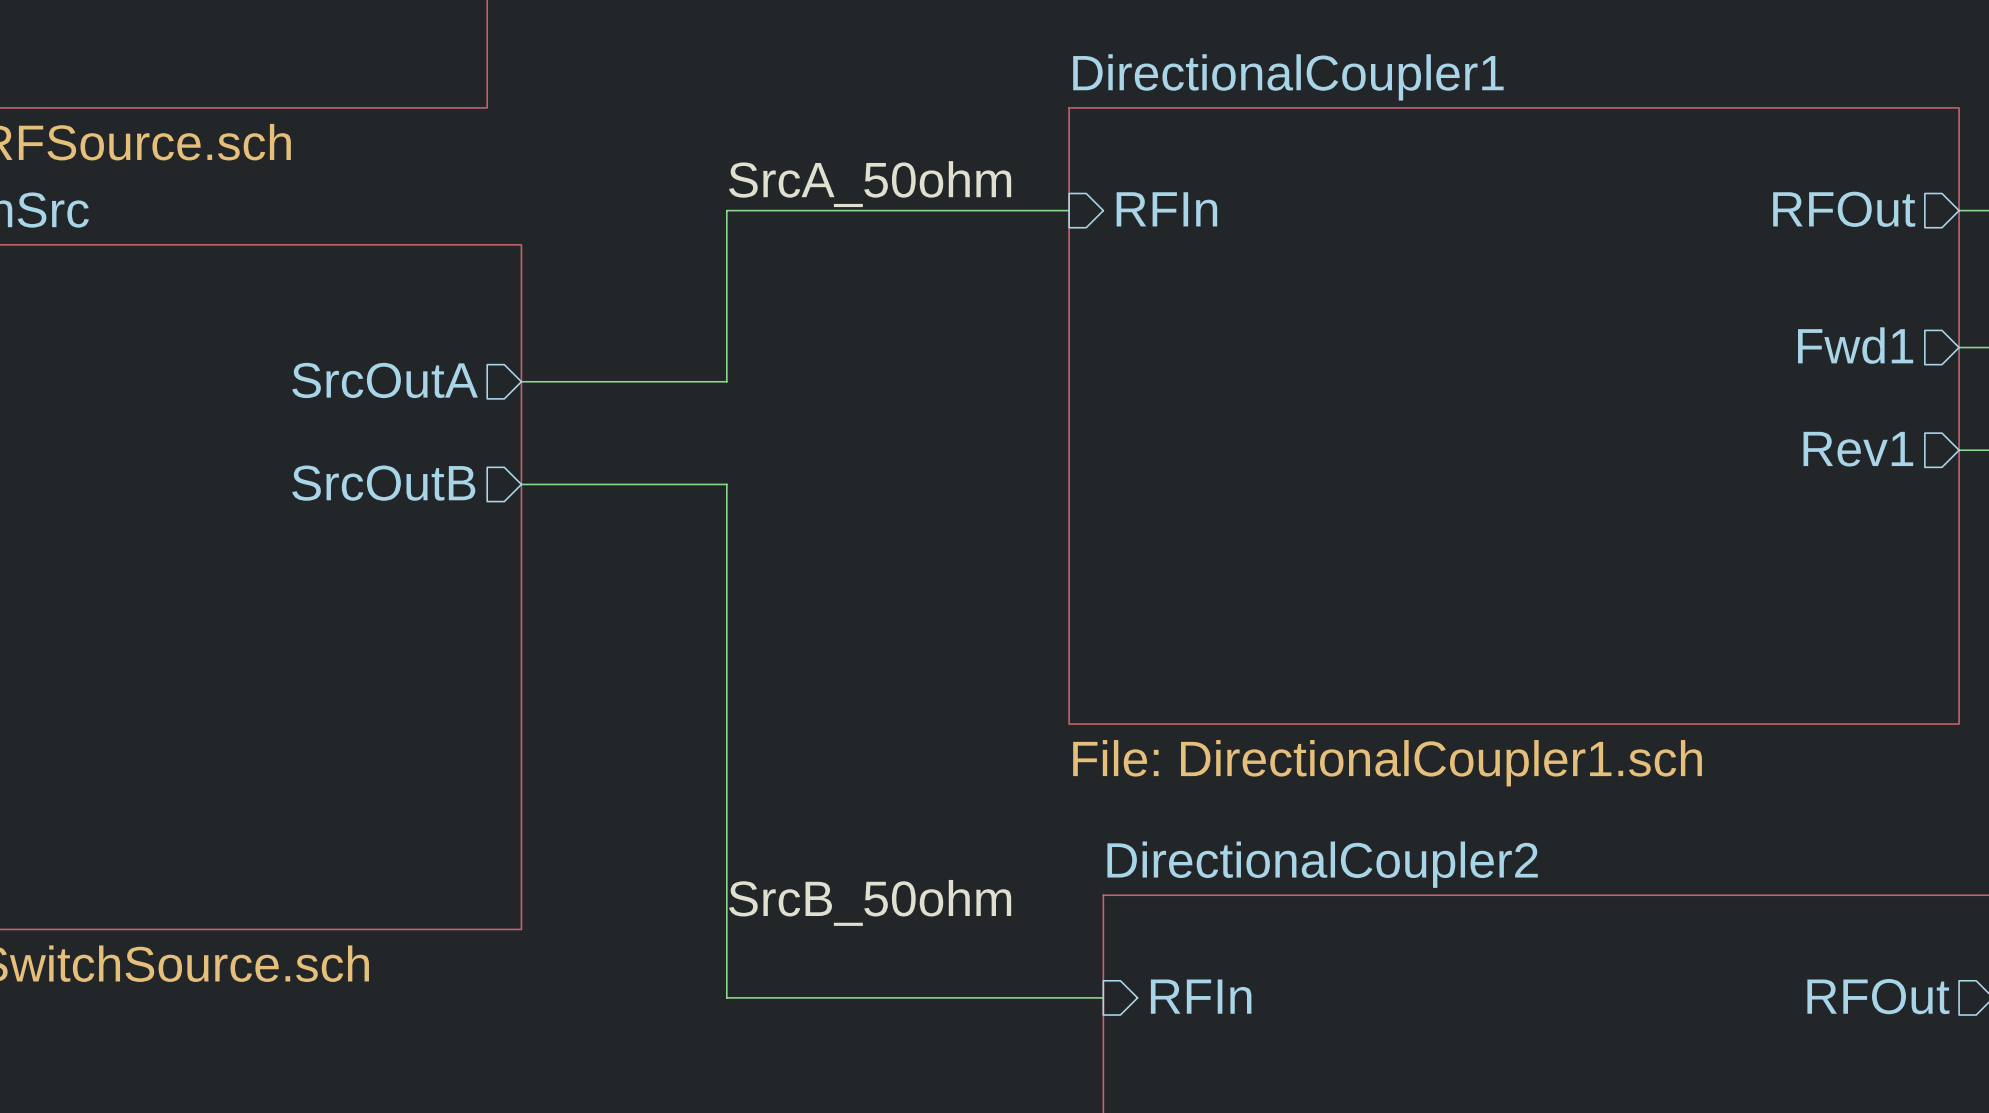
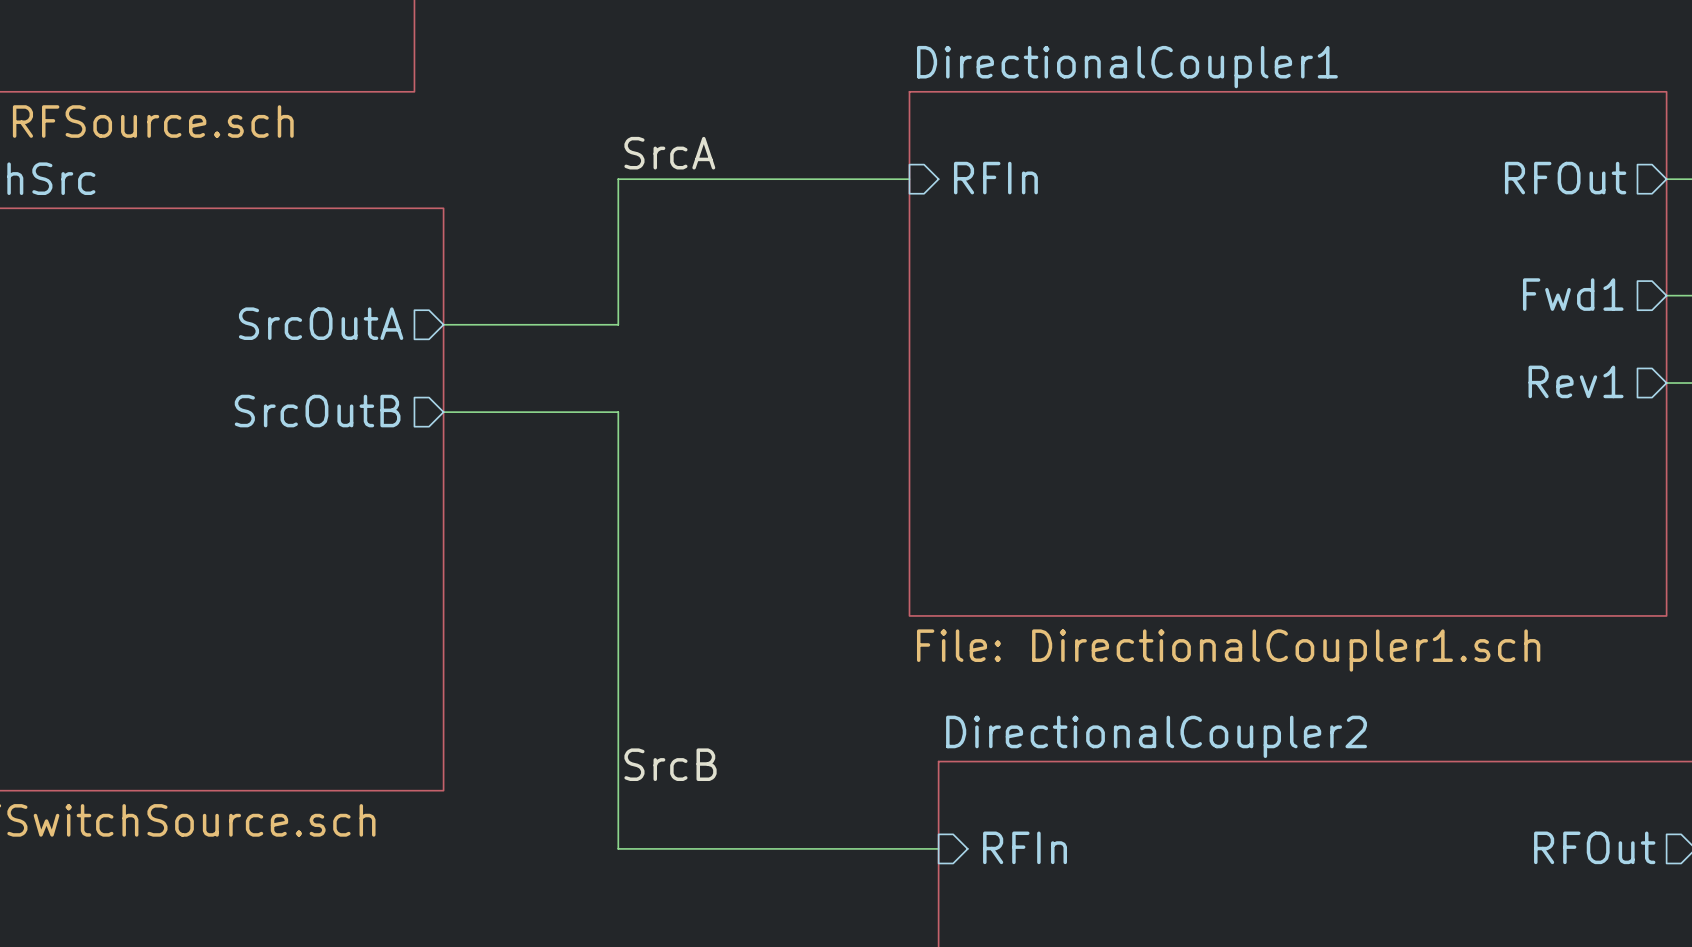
label: SrcA_50ohm (870, 184) -> SrcA (669, 153)
label: SrcB_50ohm (870, 902) -> SrcB (670, 764)

